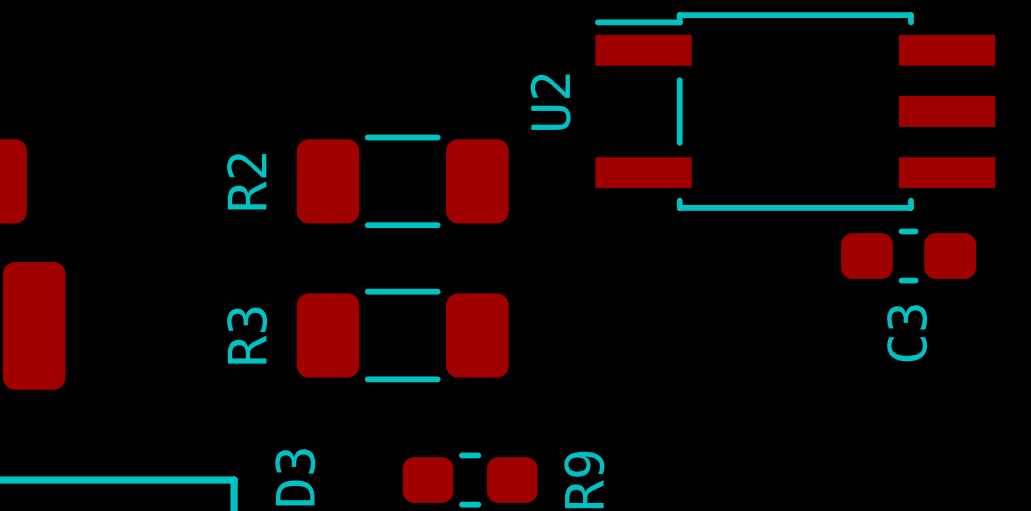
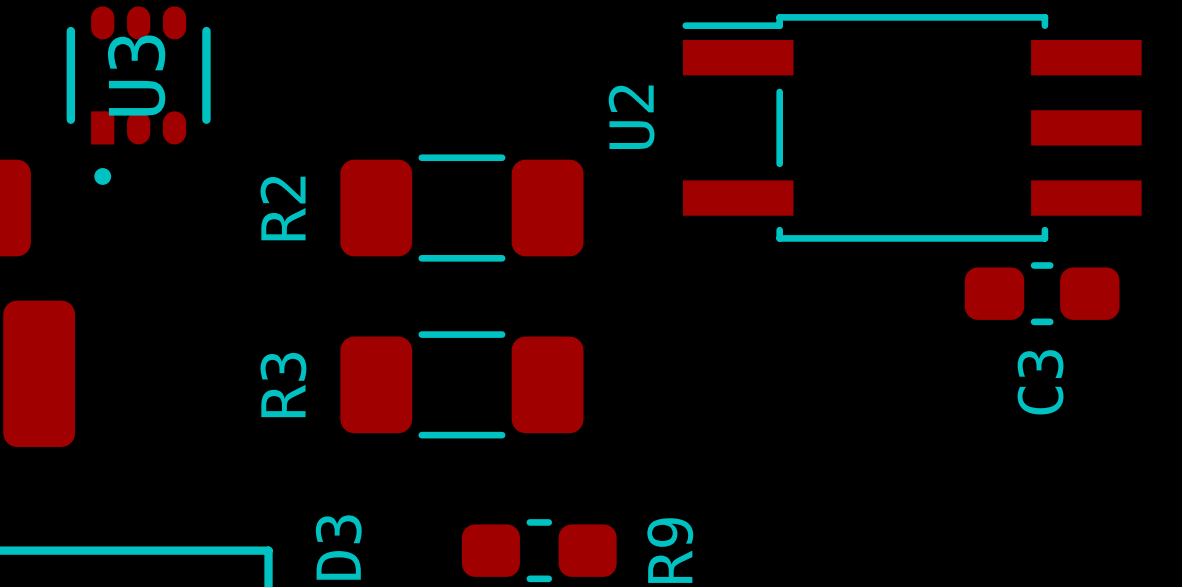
U3: none -> (138, 95)

